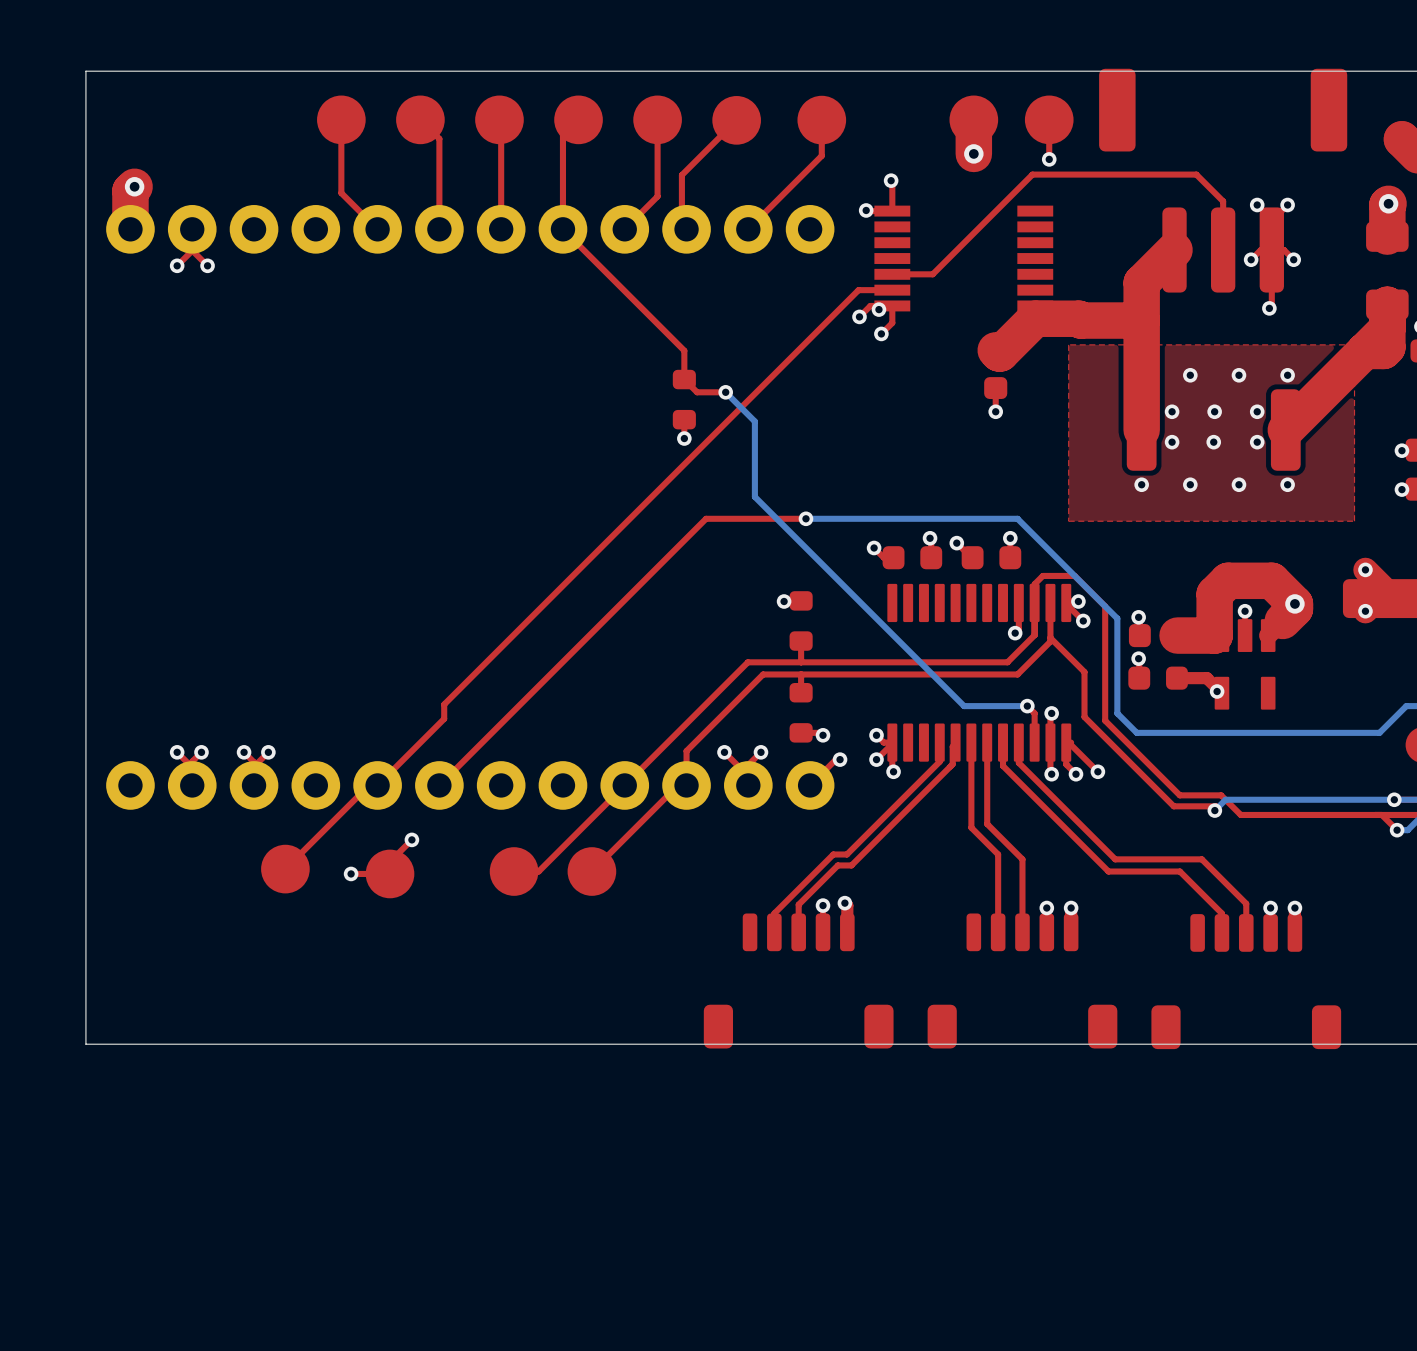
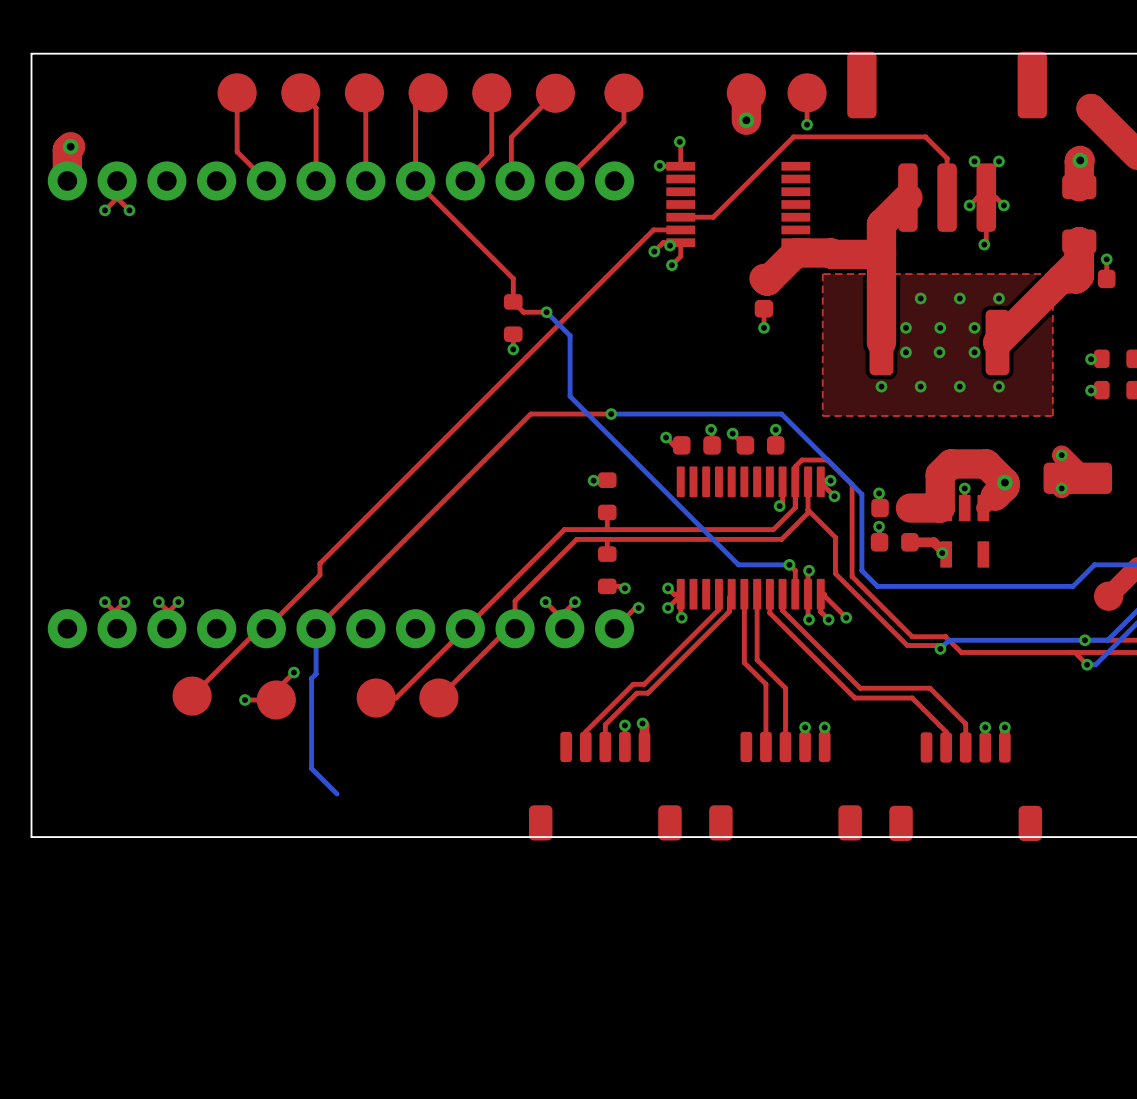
bottom track: none -> (316, 628) (316, 673) (311, 678) (311, 768) (337, 793)

